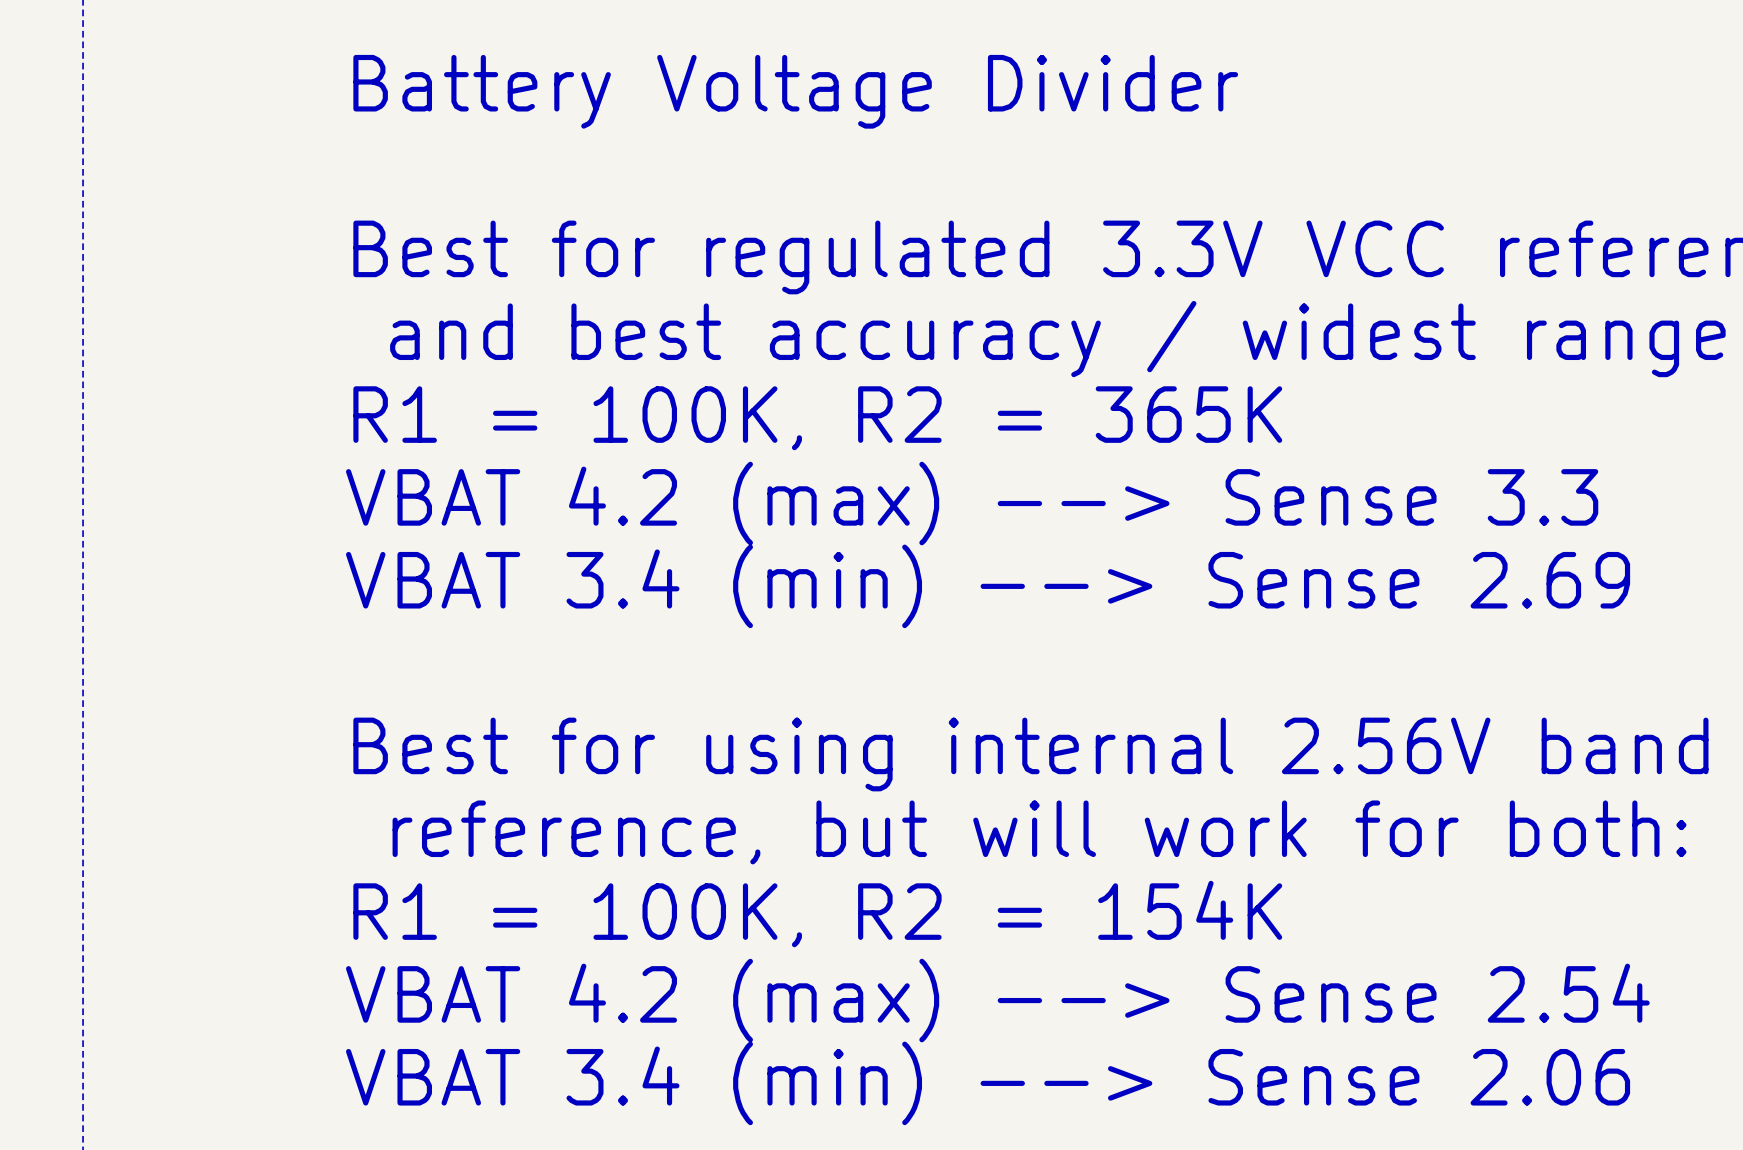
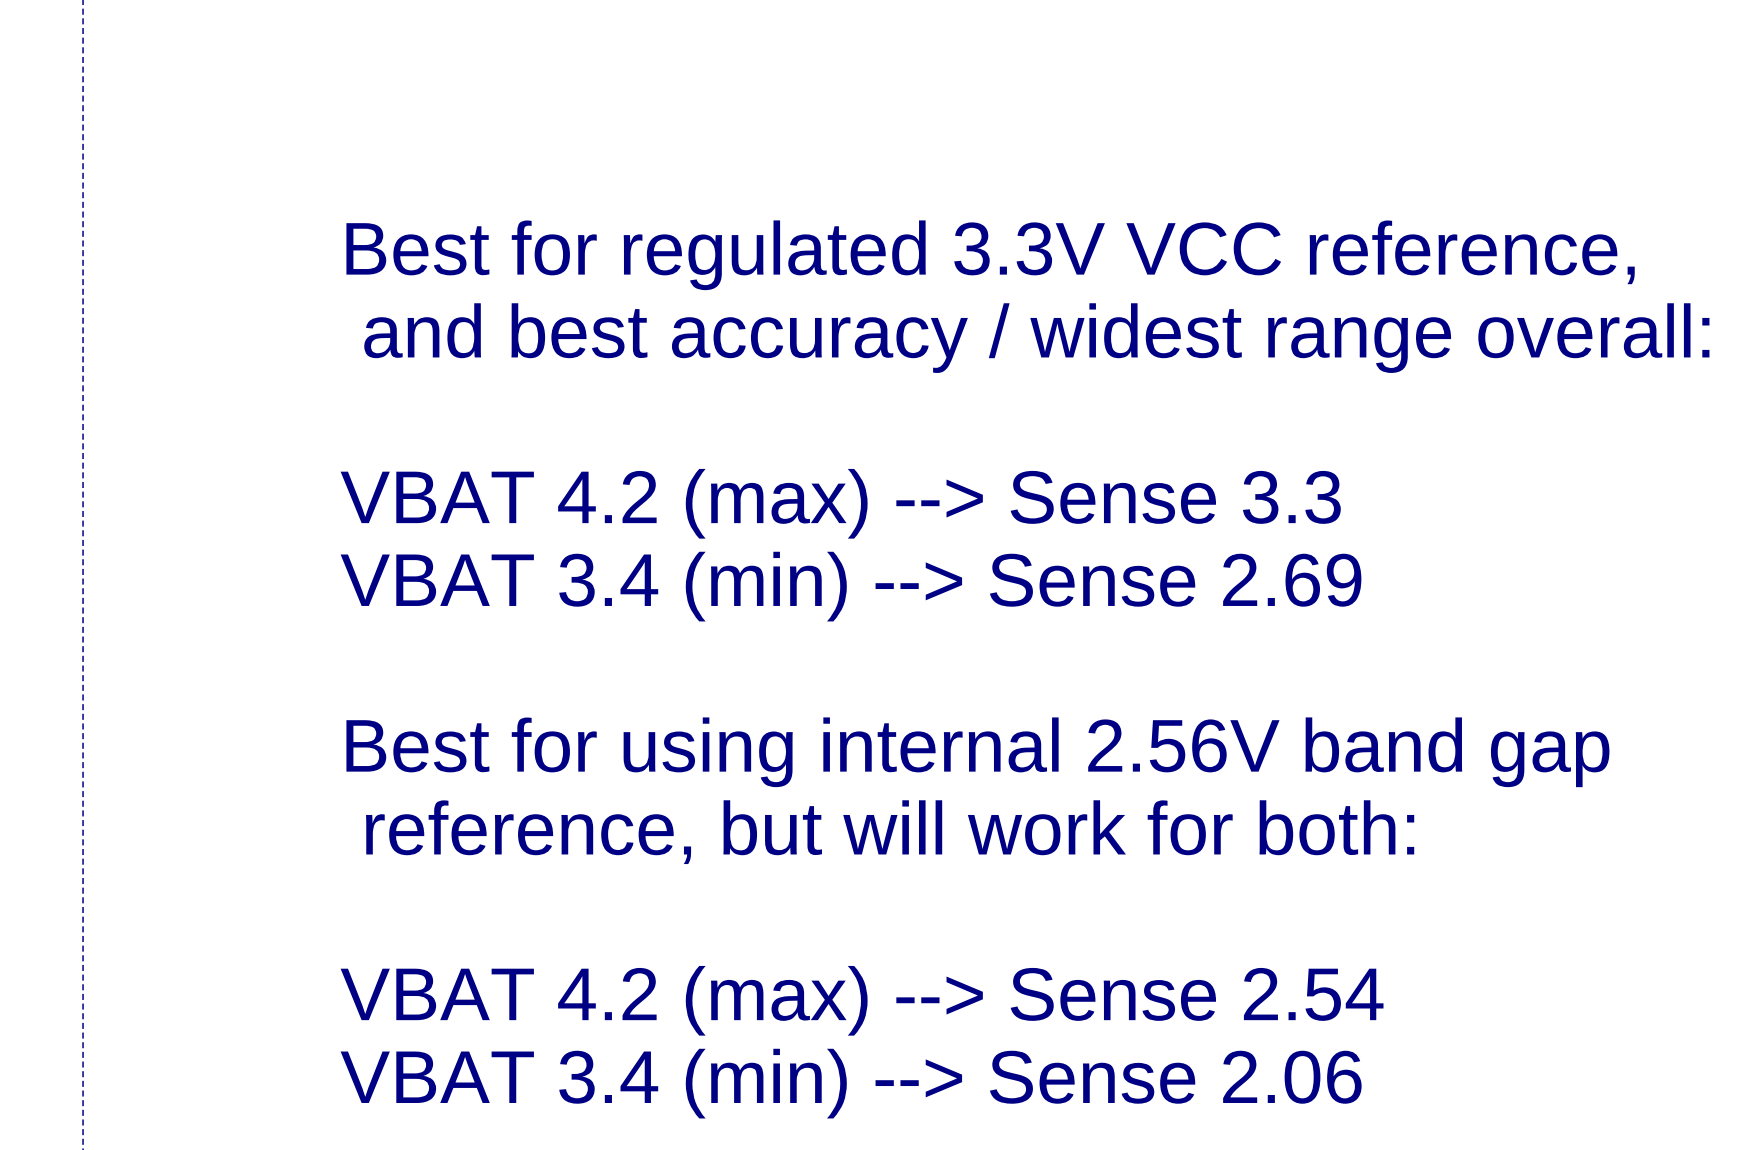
text: Battery Voltage Divider (795, 91) -> none
text: R1 = 100K, R2 = 365K (817, 418) -> none
text: R1 = 100K, R2 = 154K (817, 914) -> none

